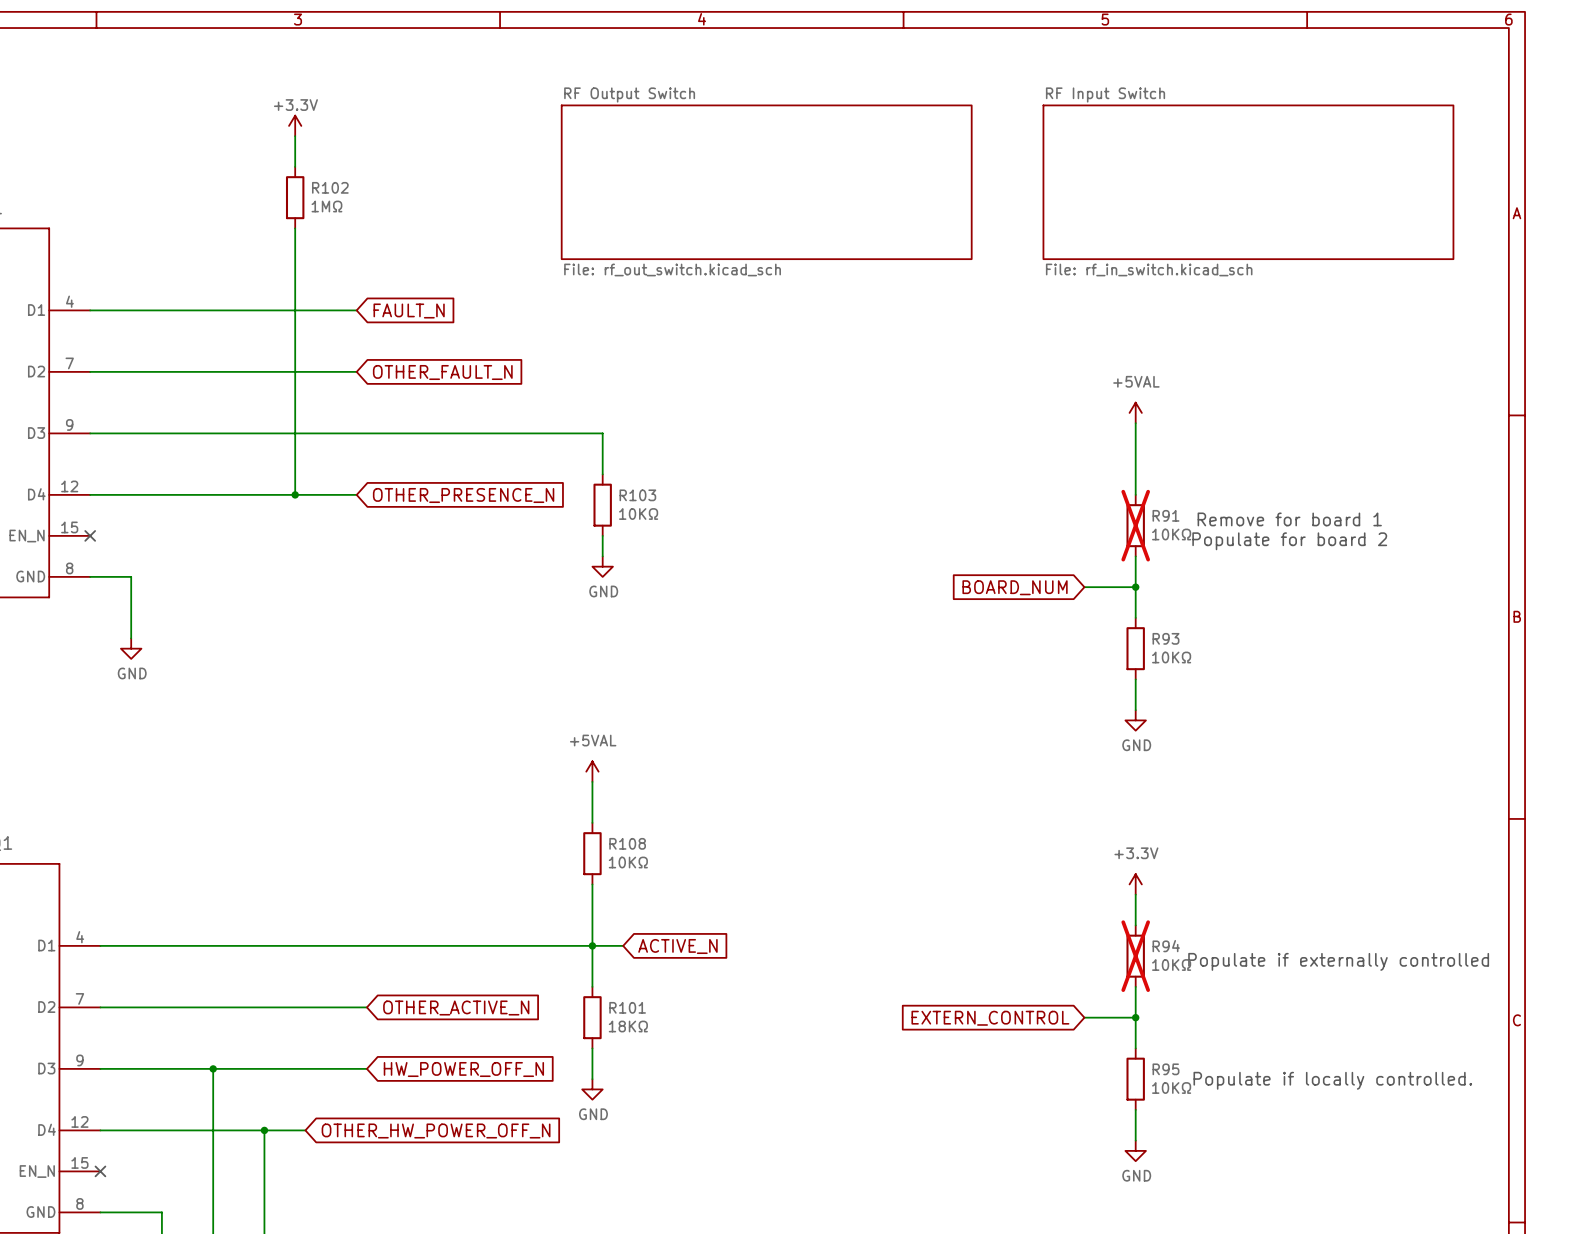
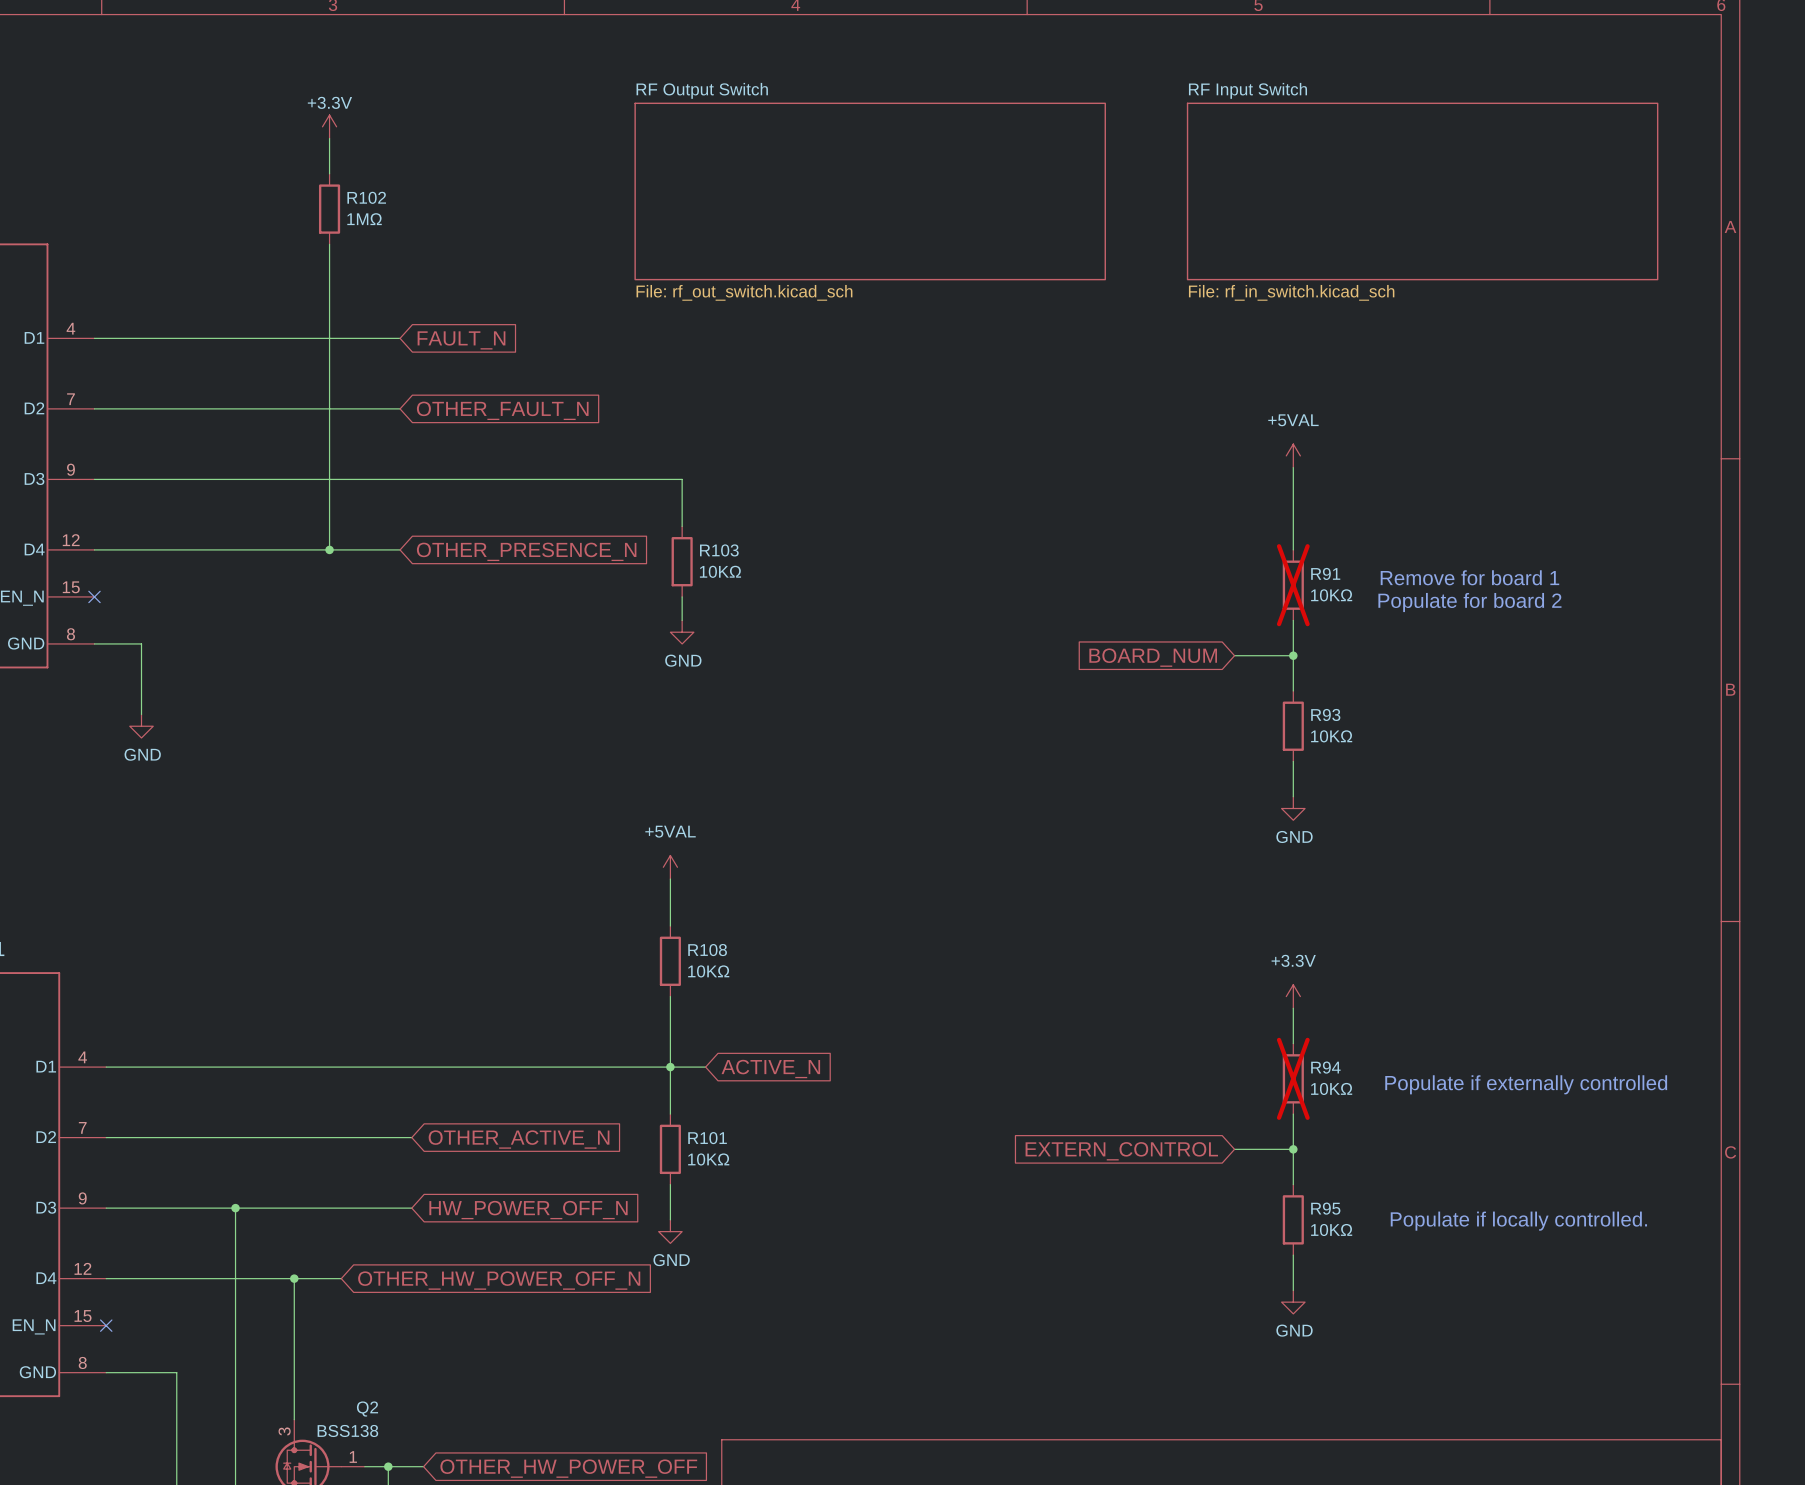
R101 value: 18KΩ (628, 1026) -> 10KΩ (708, 1159)

